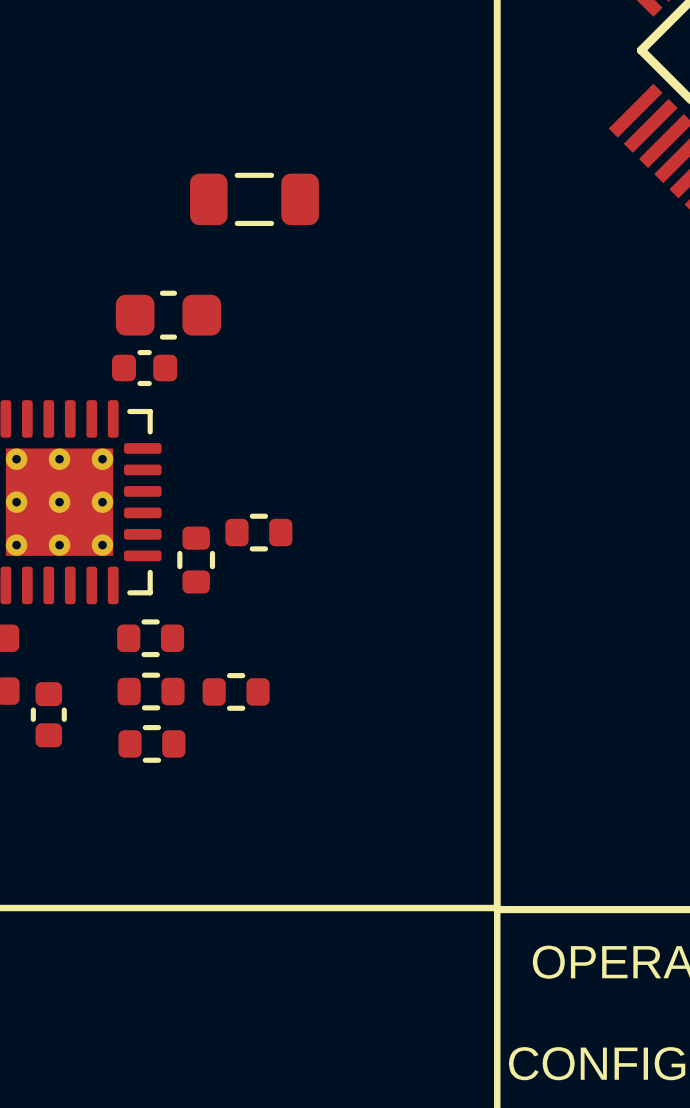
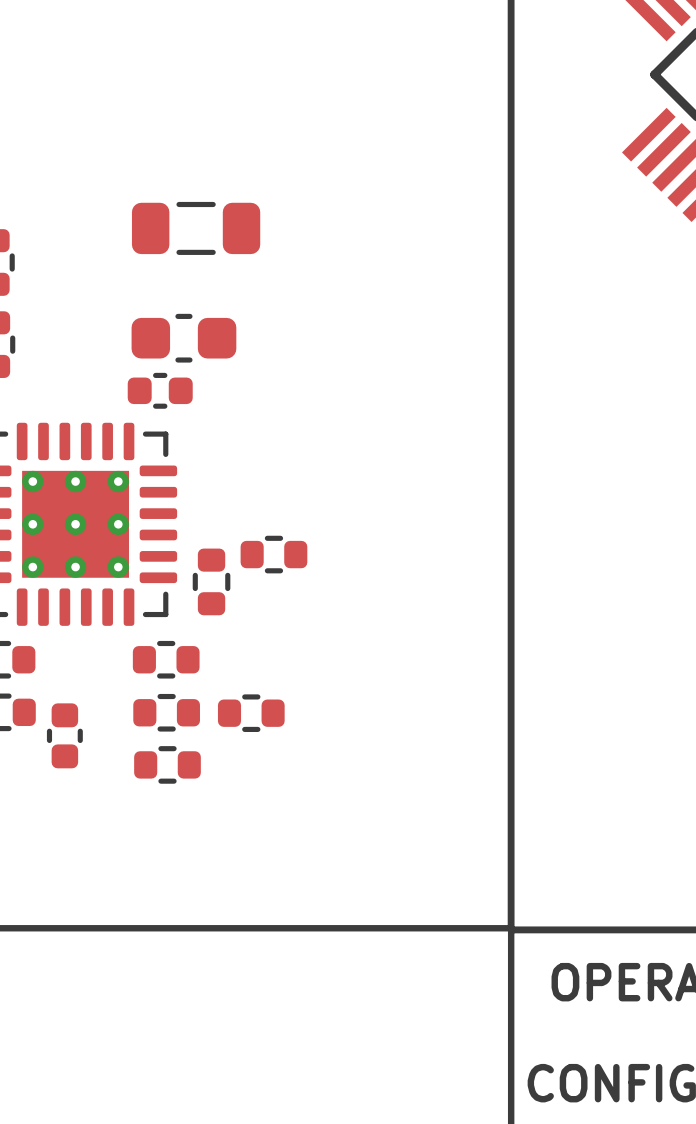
part position: (254, 199) -> (196, 228)

